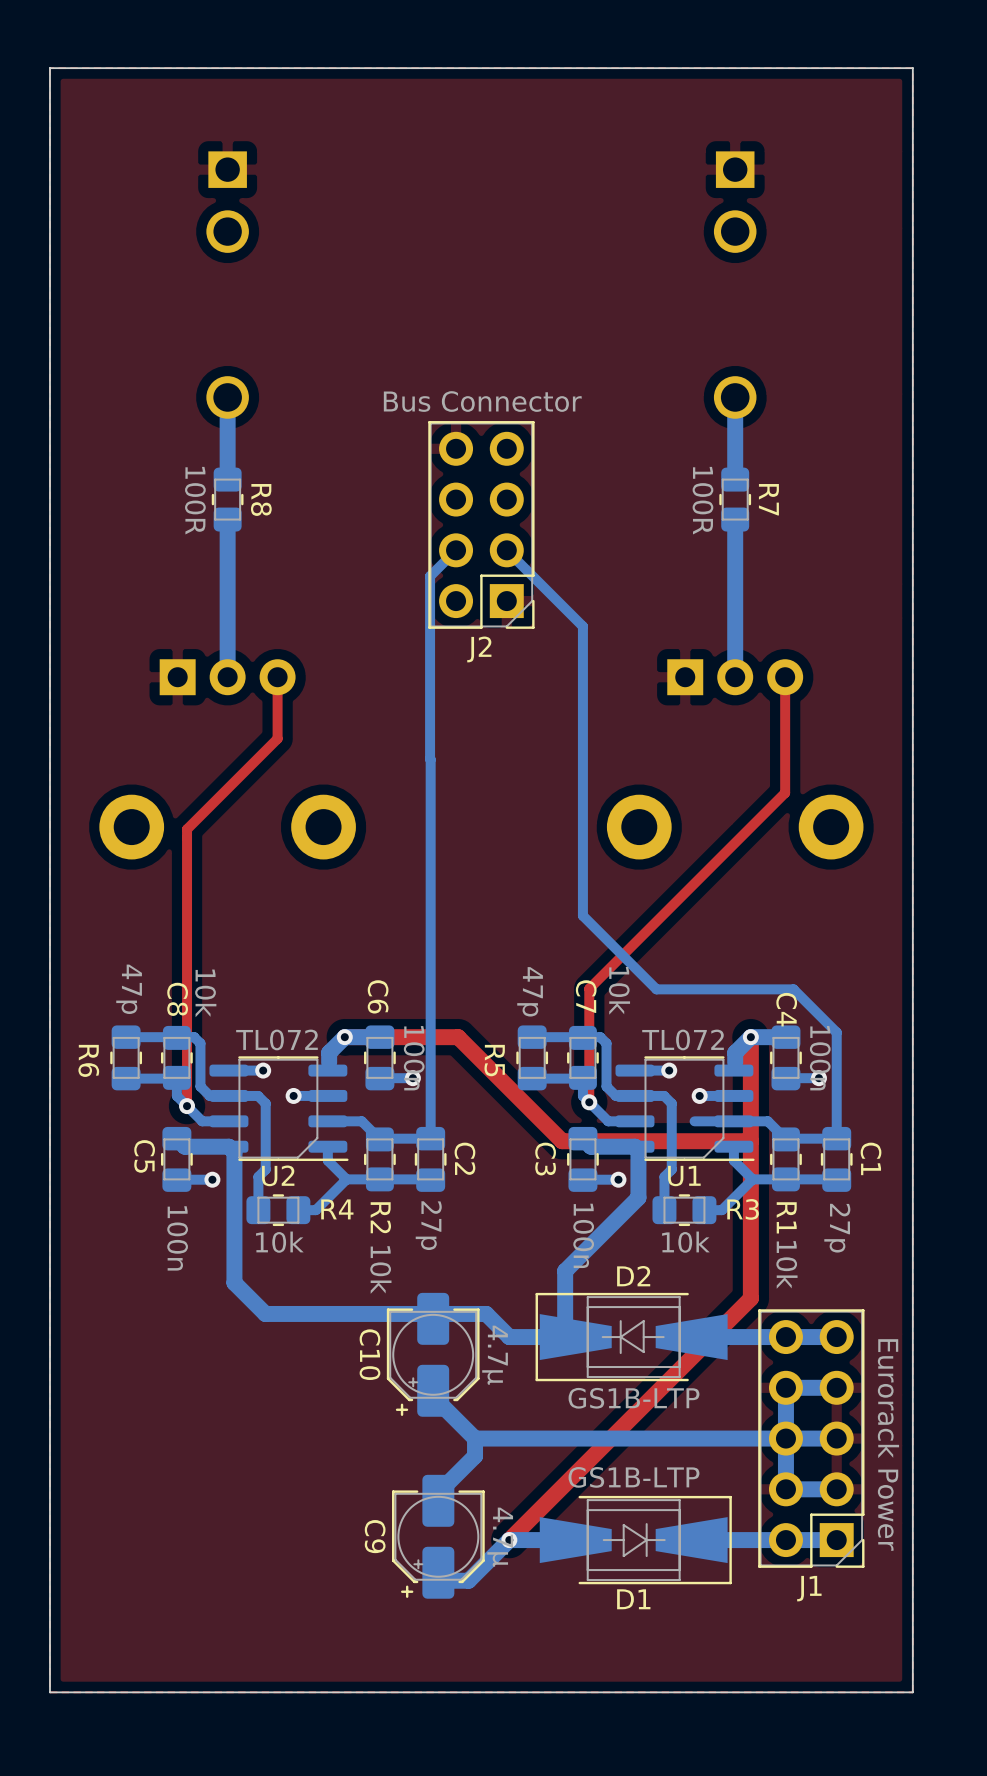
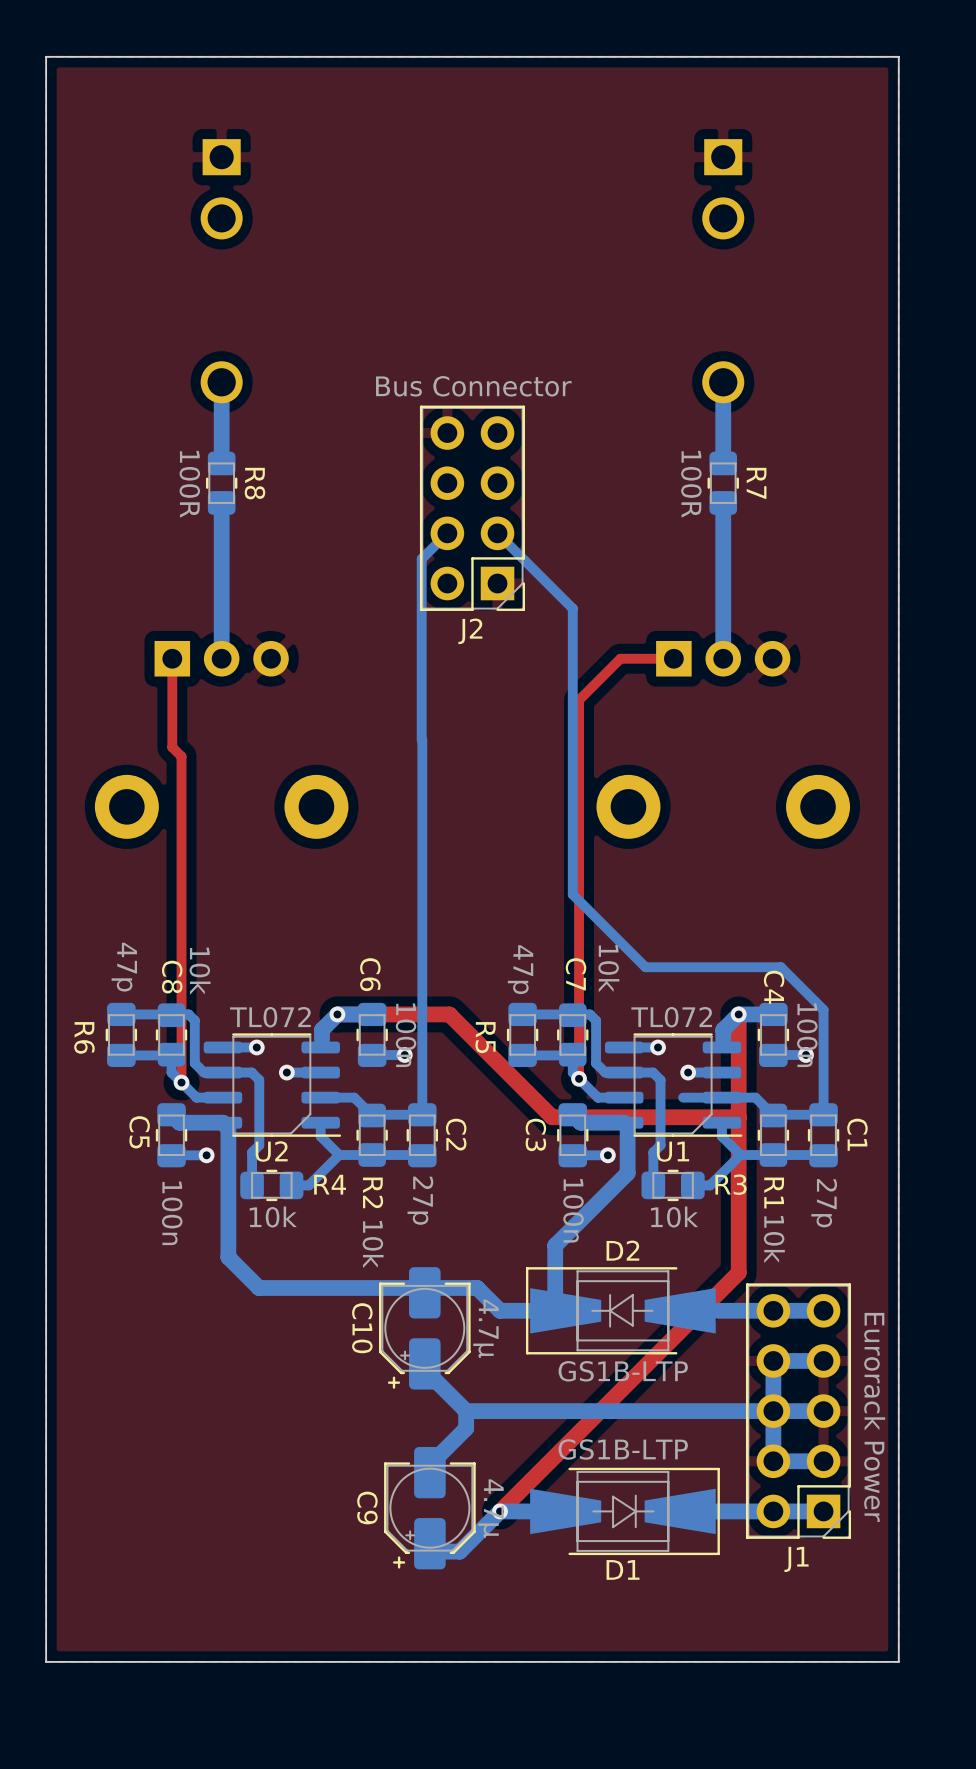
top track: (277, 677) (277, 738) (187, 829) -> (172, 658) (172, 747) (181, 756) (181, 809)
top track: (785, 677) (785, 792) (589, 988) -> (673, 658) (620, 658) (579, 700) (579, 966)

